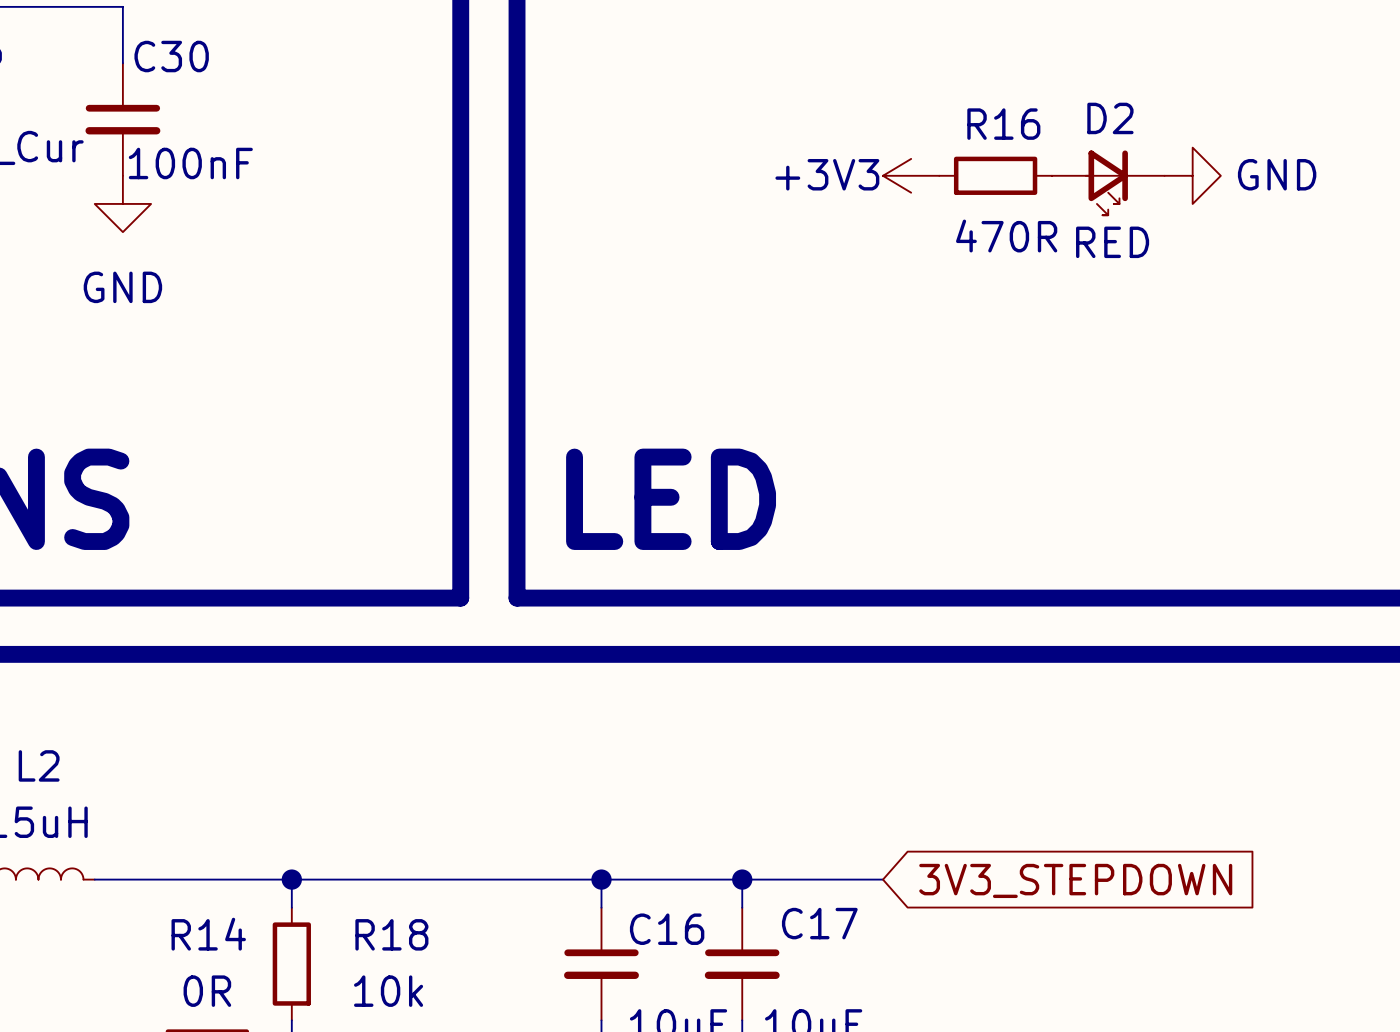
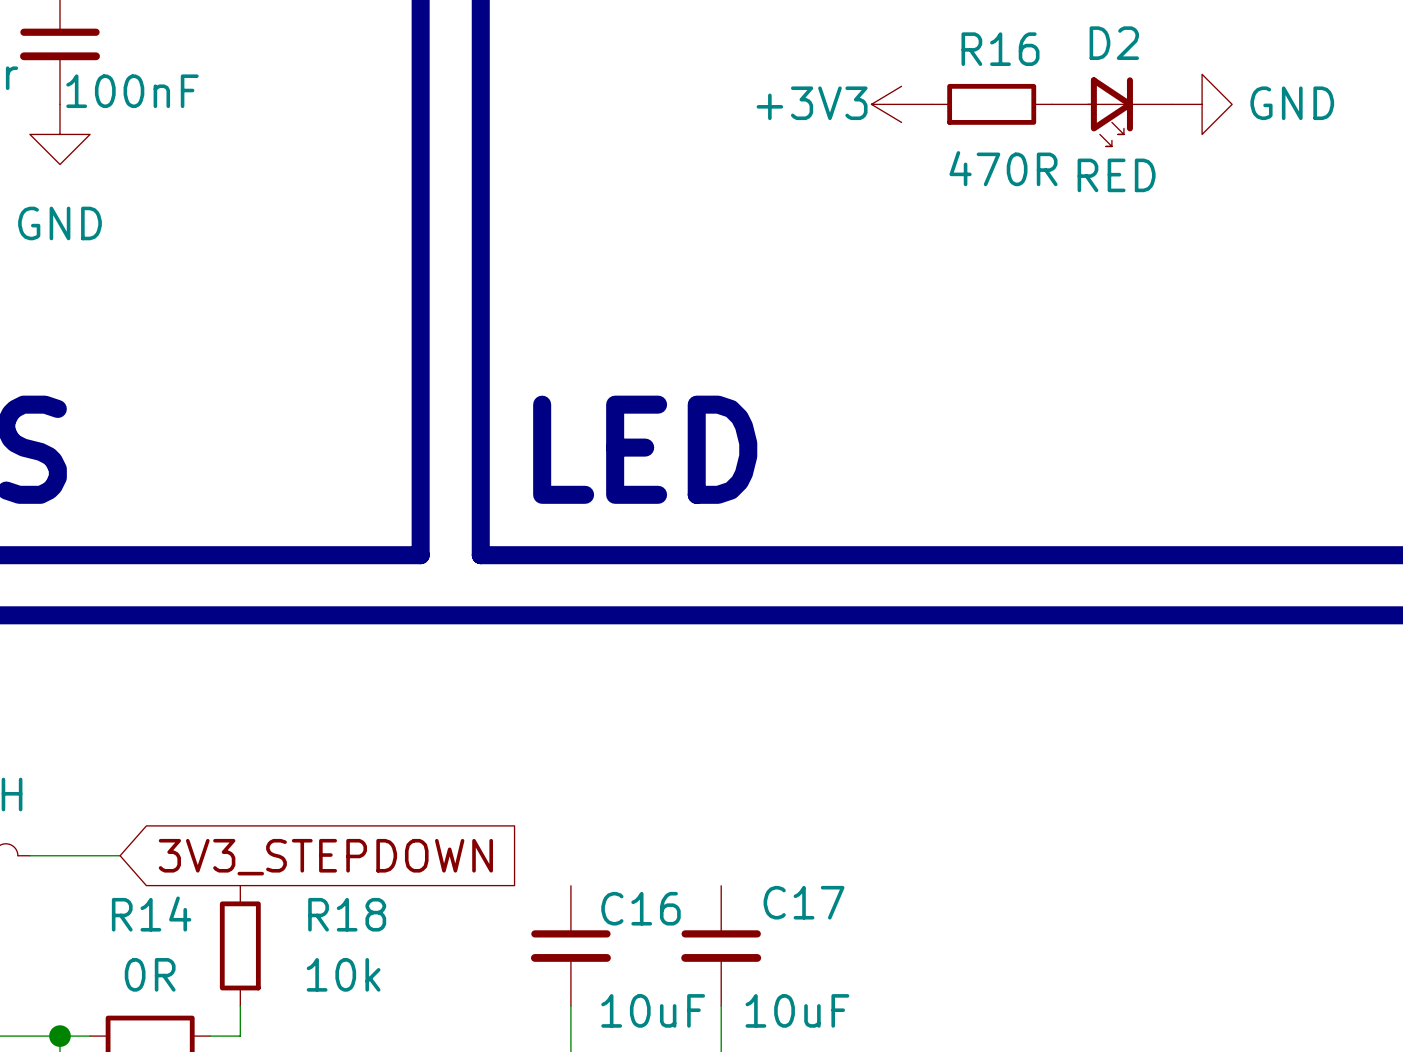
wire: (179, 879) (883, 879) -> none
wire: (291, 879) (291, 907) -> none
junction: (291, 879) -> none
wire: (601, 879) (601, 907) -> none
junction: (601, 879) -> none
wire: (742, 879) (742, 907) -> none
junction: (742, 879) -> none
global label: none -> 3V3_STEPDOWN (325, 857)
global label: 3V3_STEPDOWN (1075, 880) -> none

